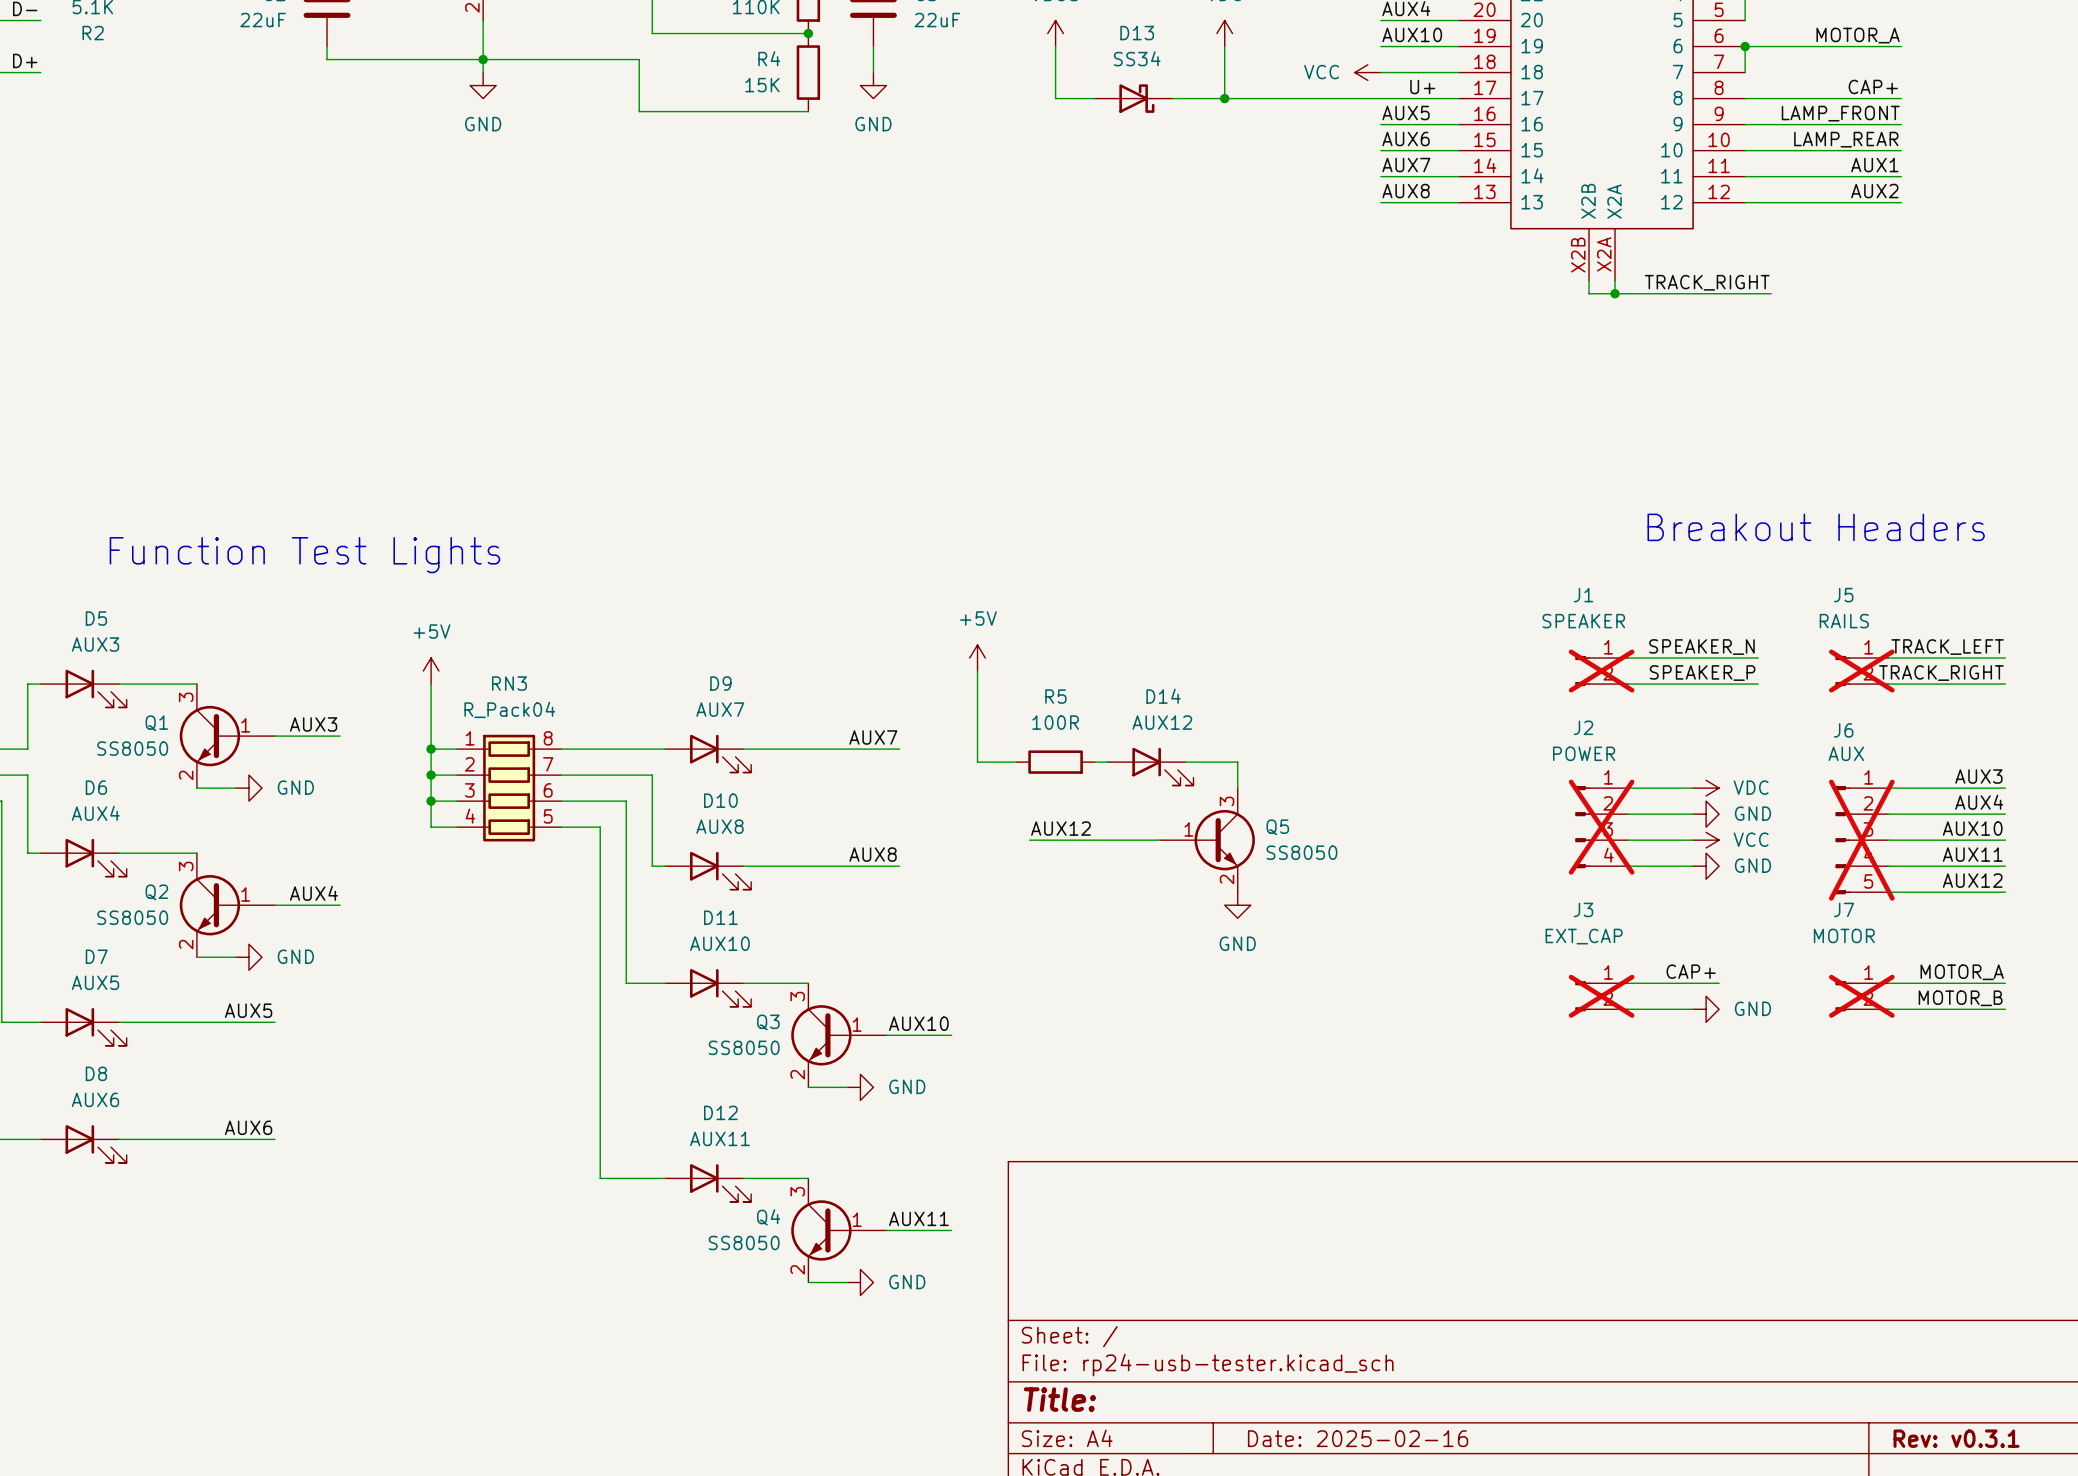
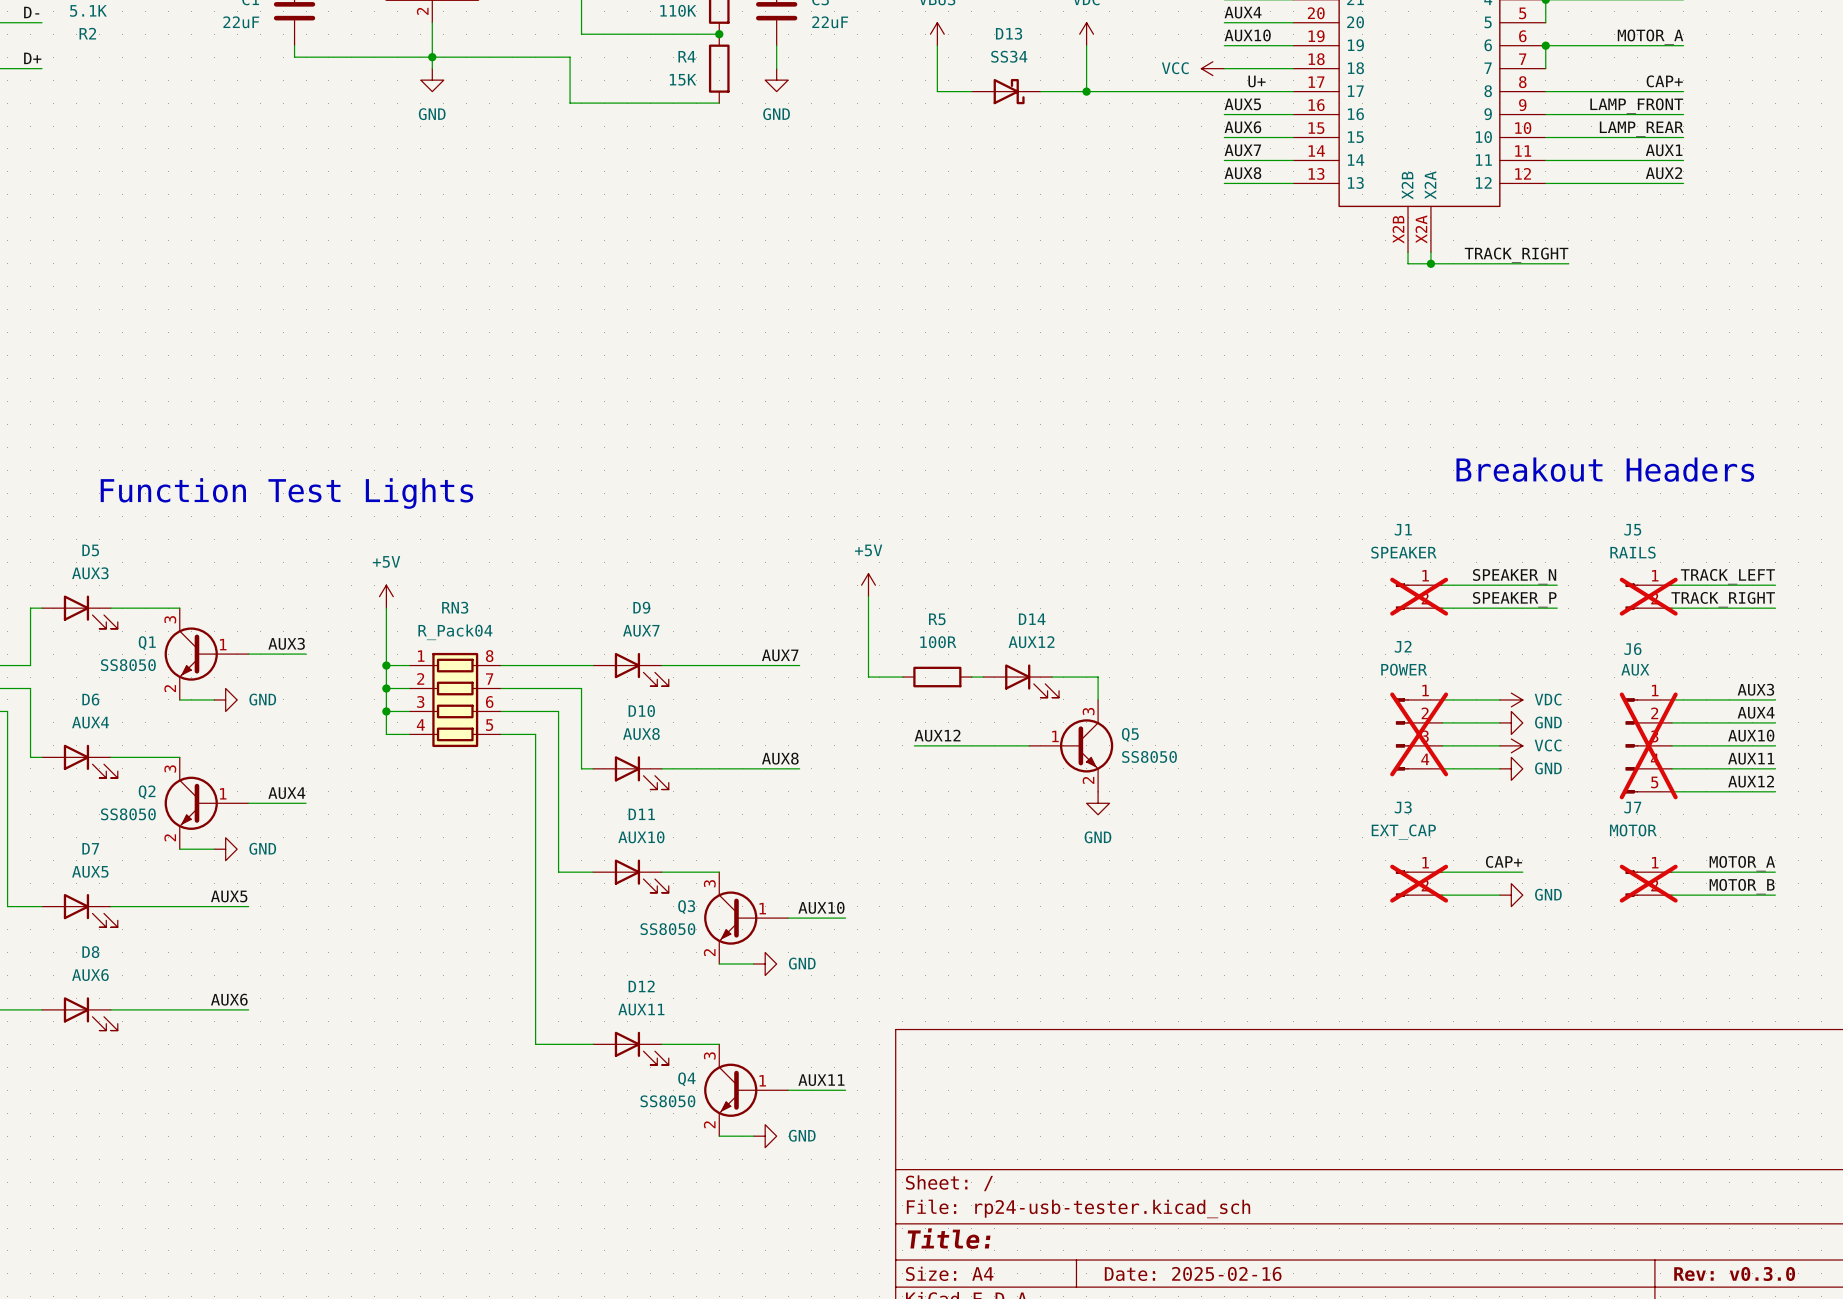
title block: Rev: v0.3.1 (1956, 1438) -> Rev: v0.3.0 (1734, 1273)

